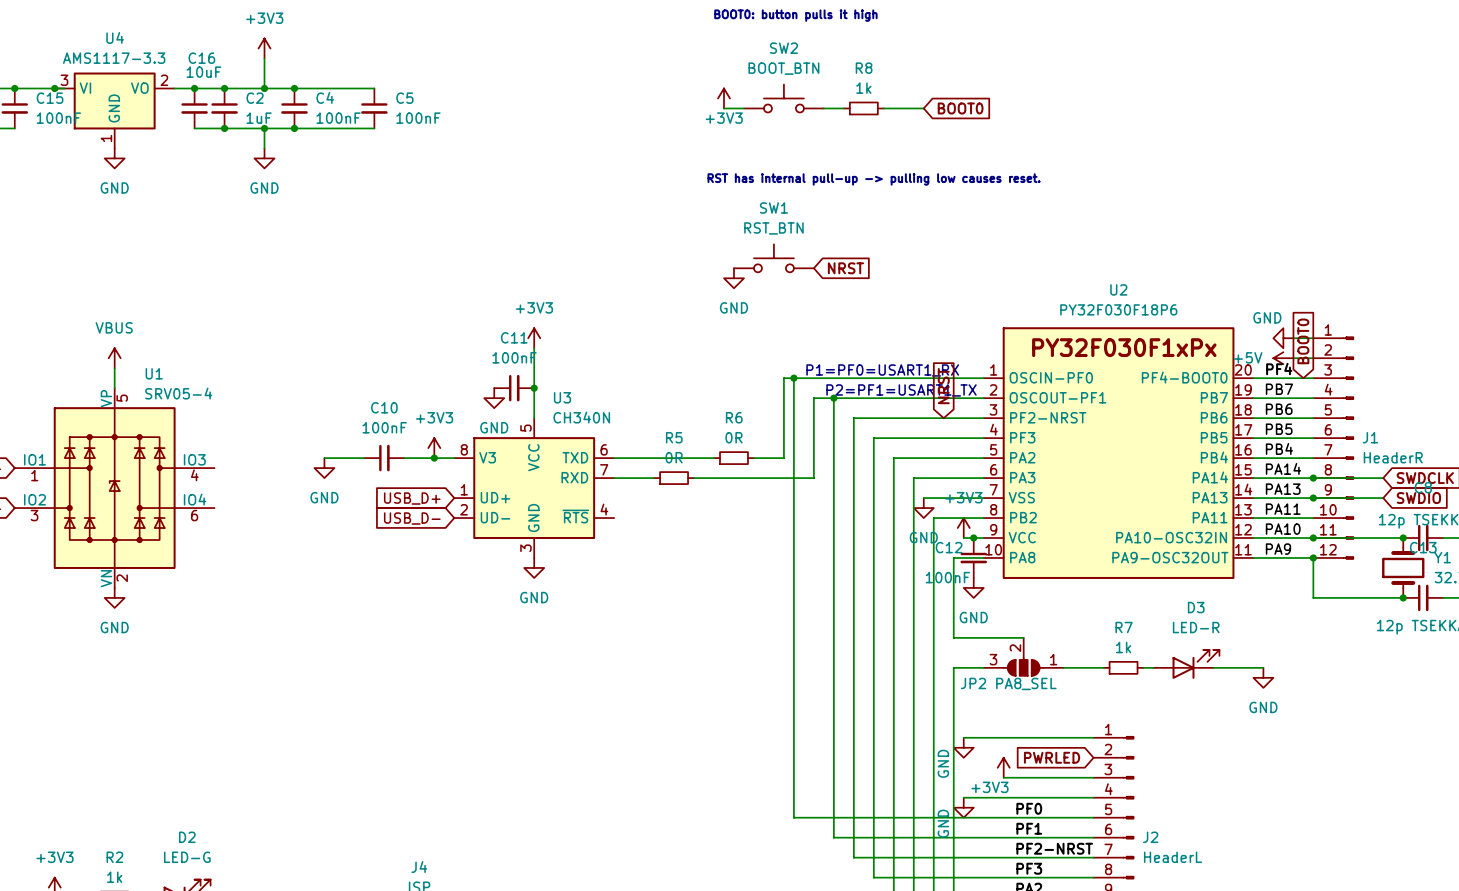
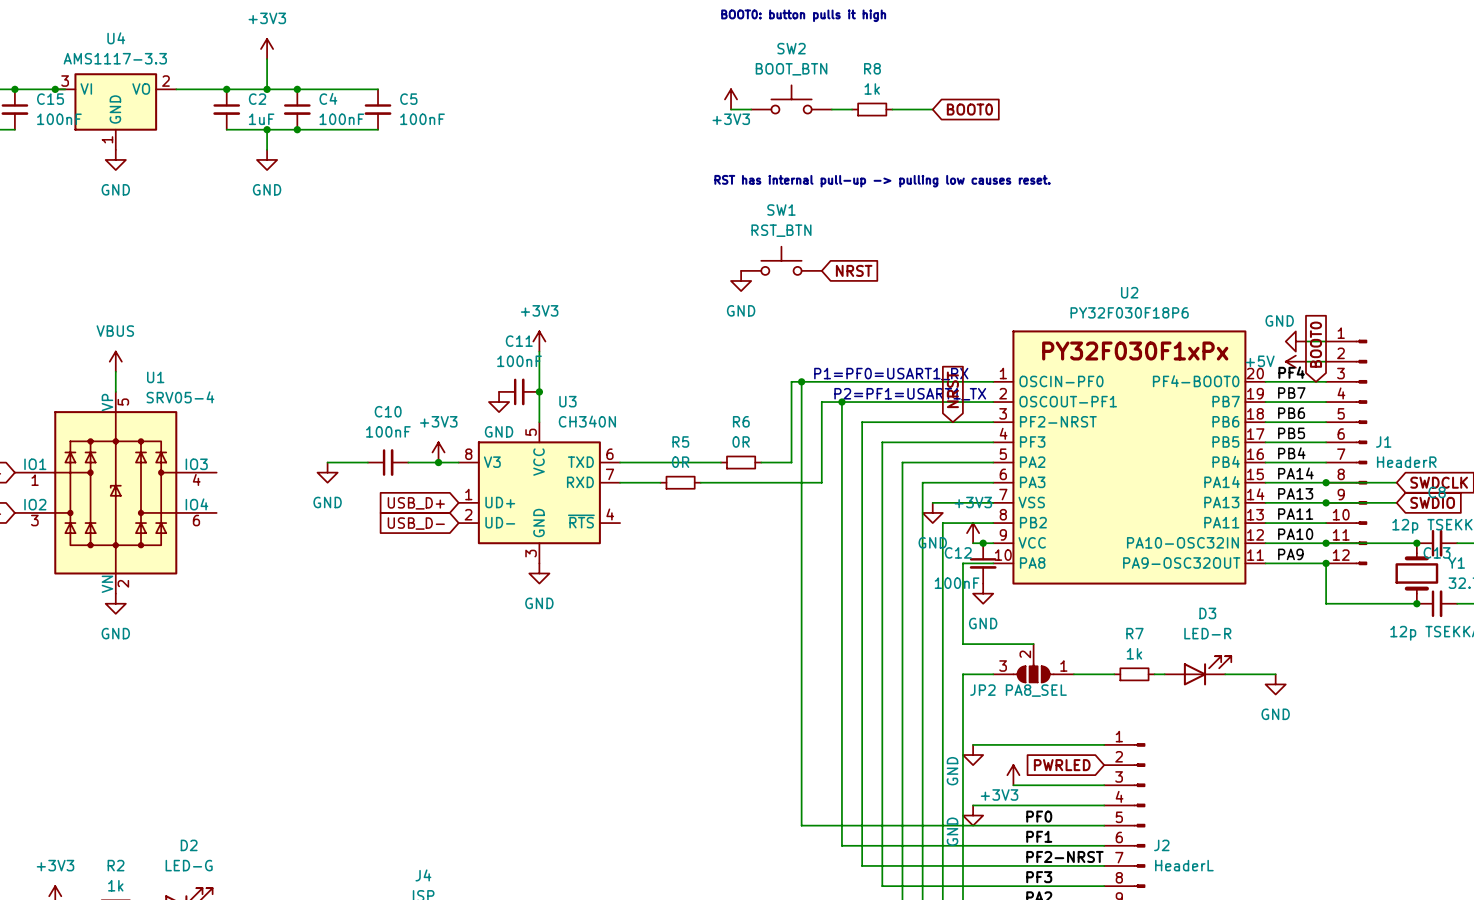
junction: (194, 88) -> none
C16: 10uF (194, 108) -> none
wire: (194, 128) (224, 128) -> none
junction: (224, 128) -> none

